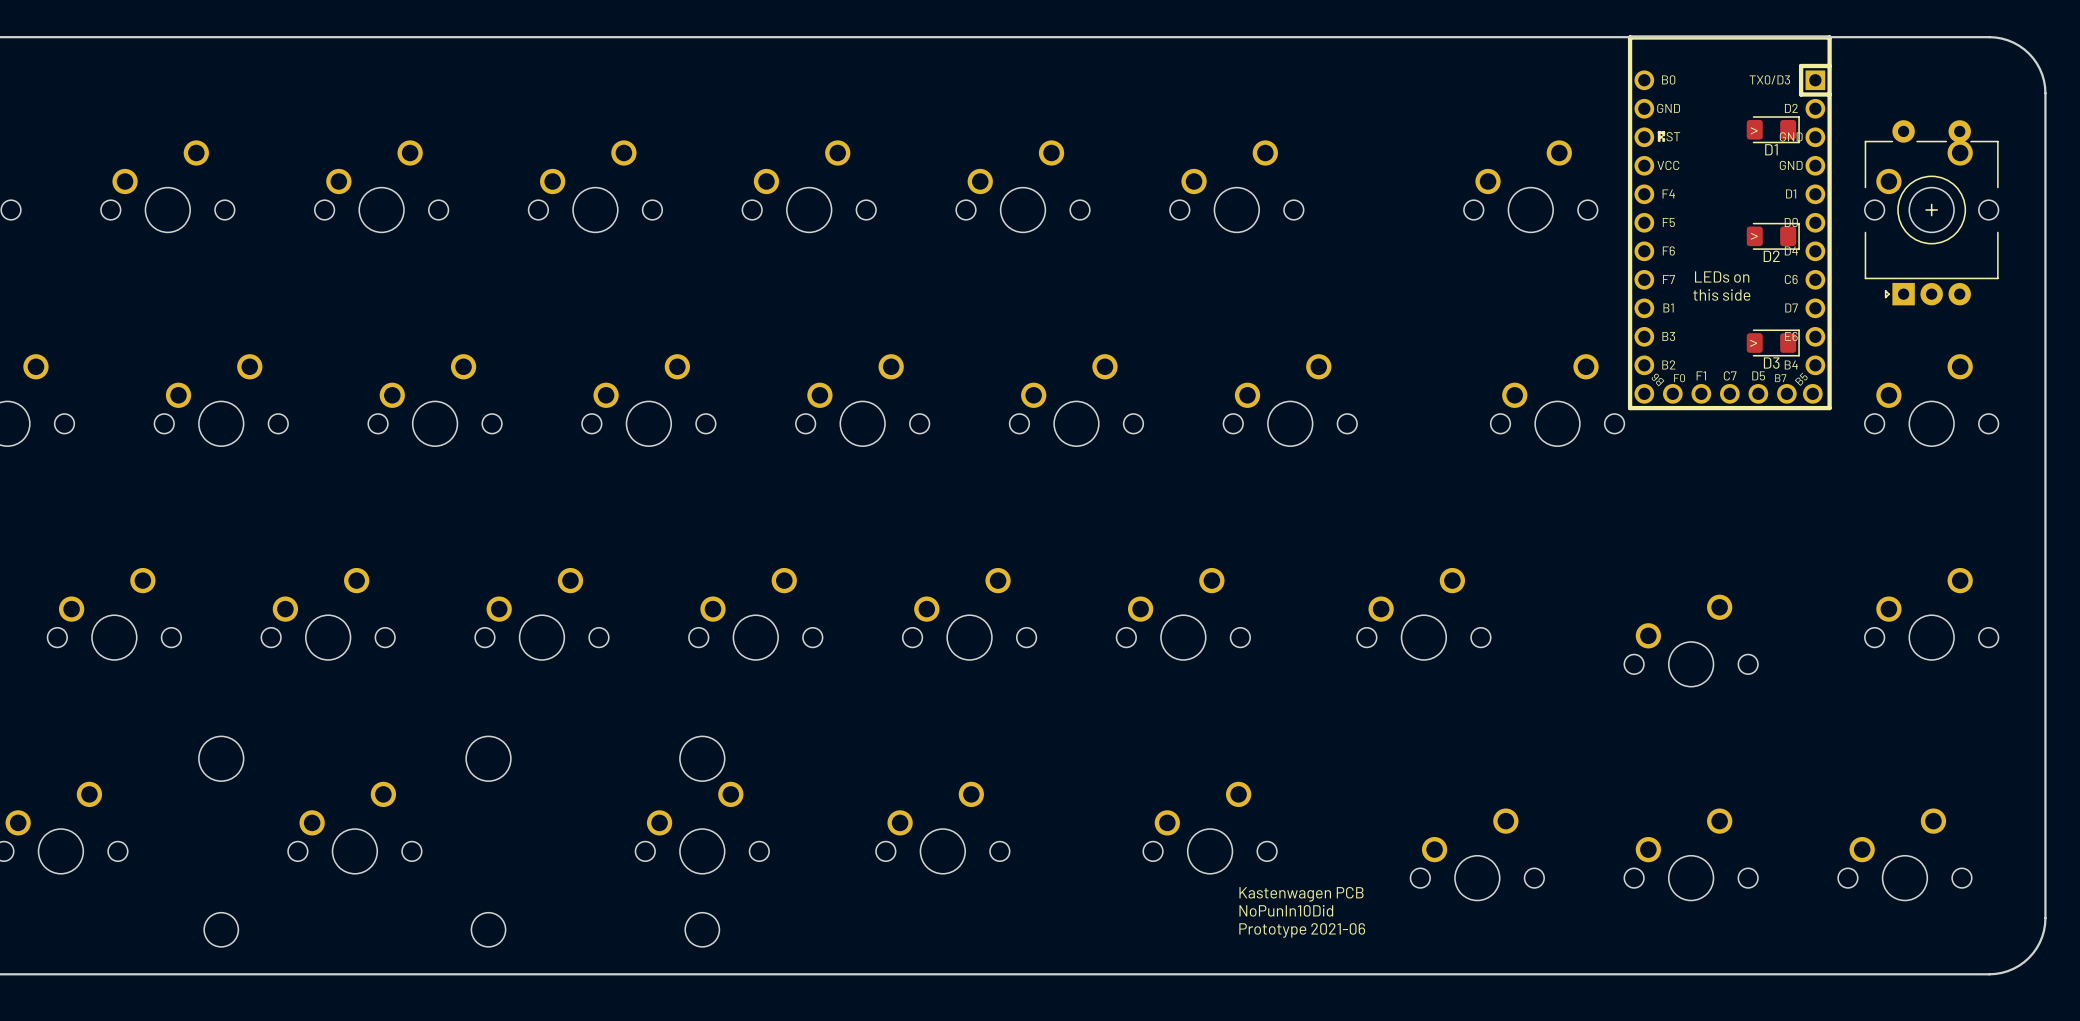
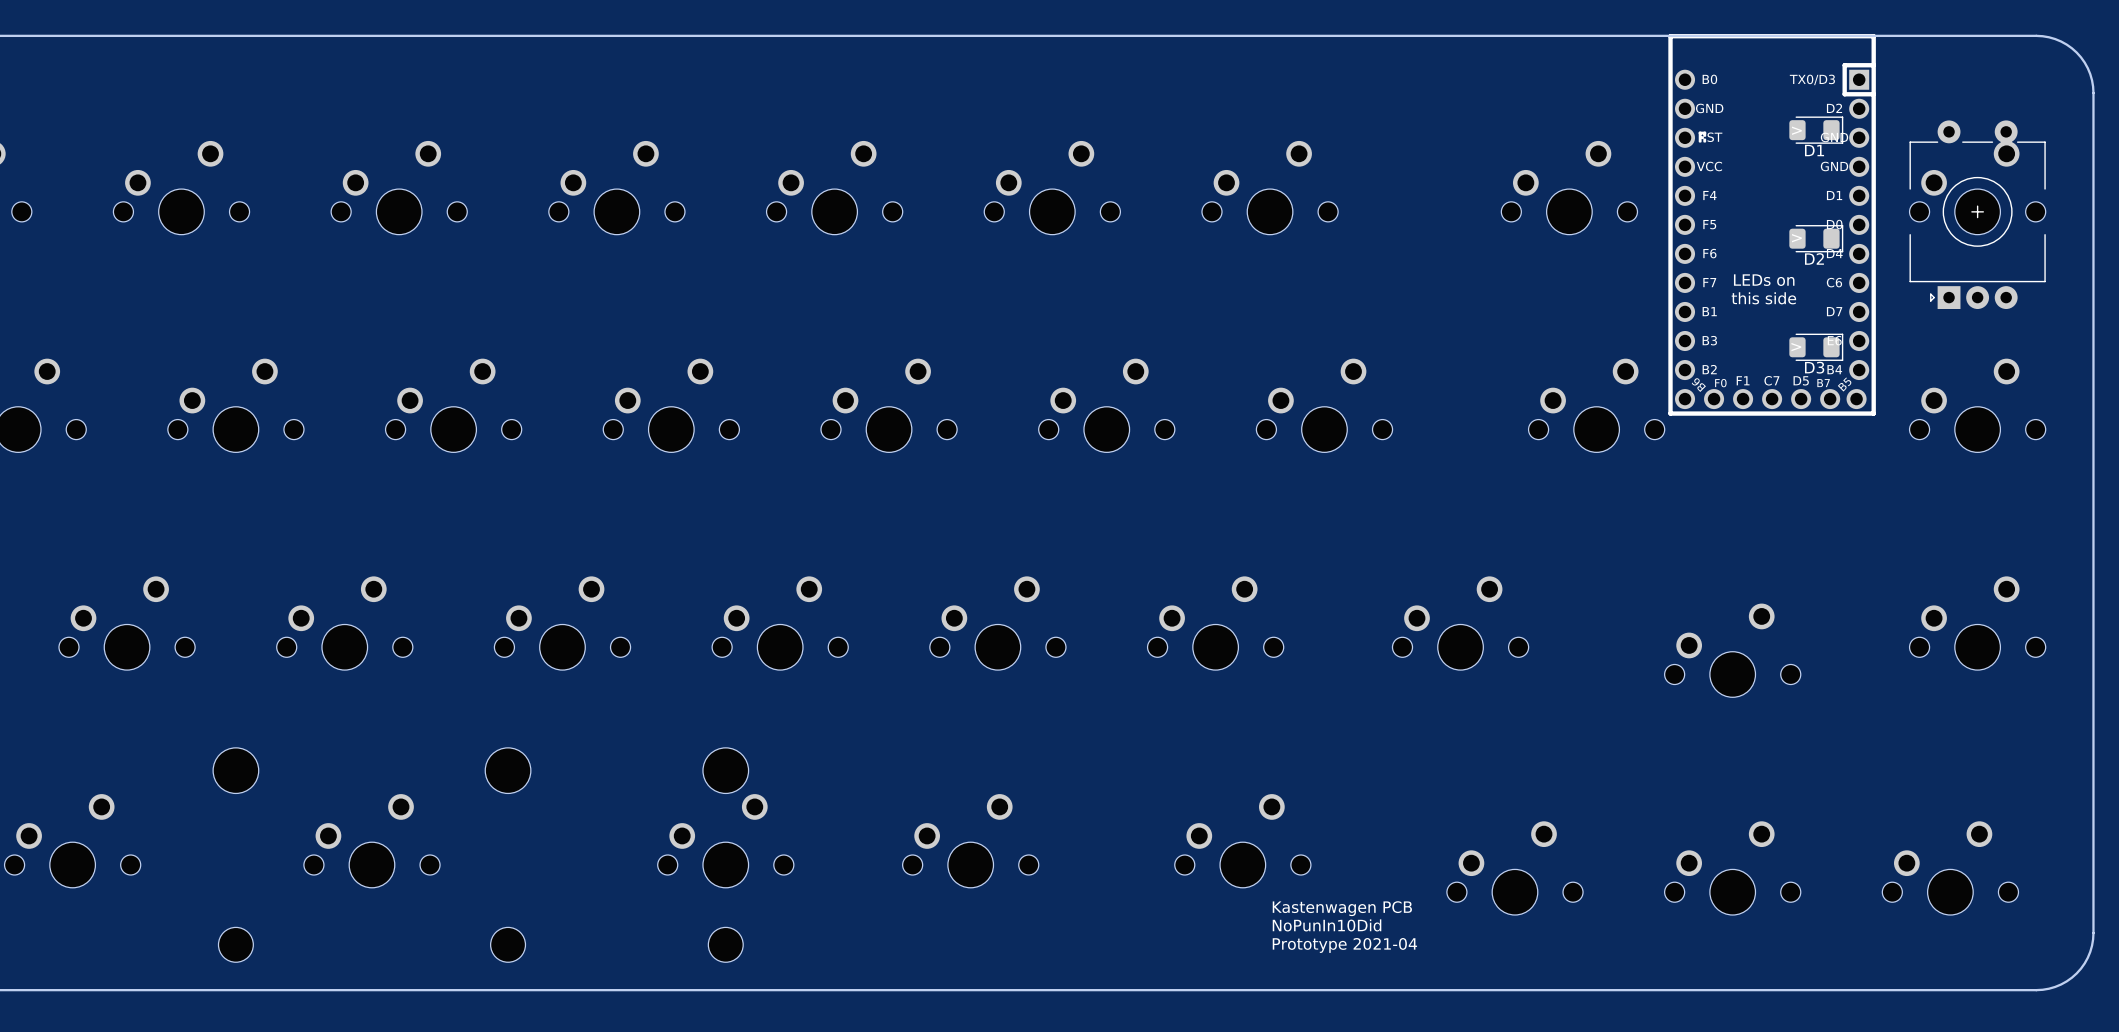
text: Prototype 2021-06 (1302, 930) -> Prototype 2021-04 (1344, 945)

